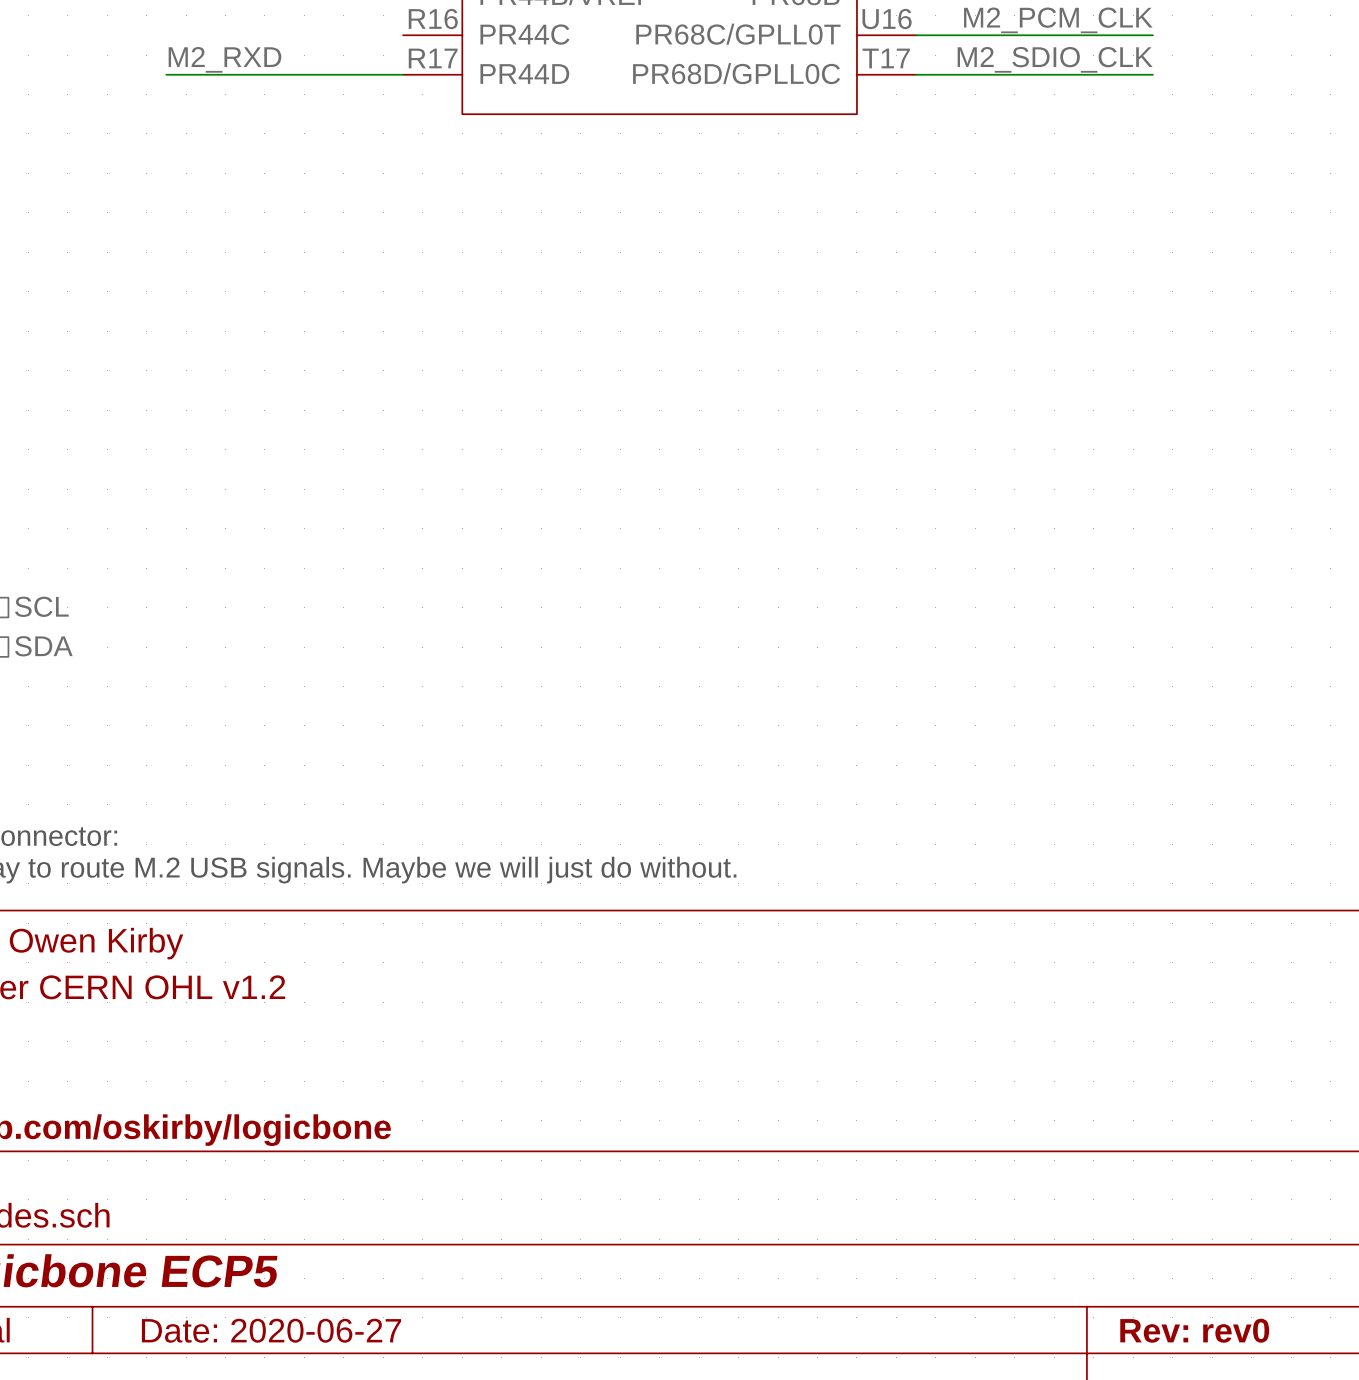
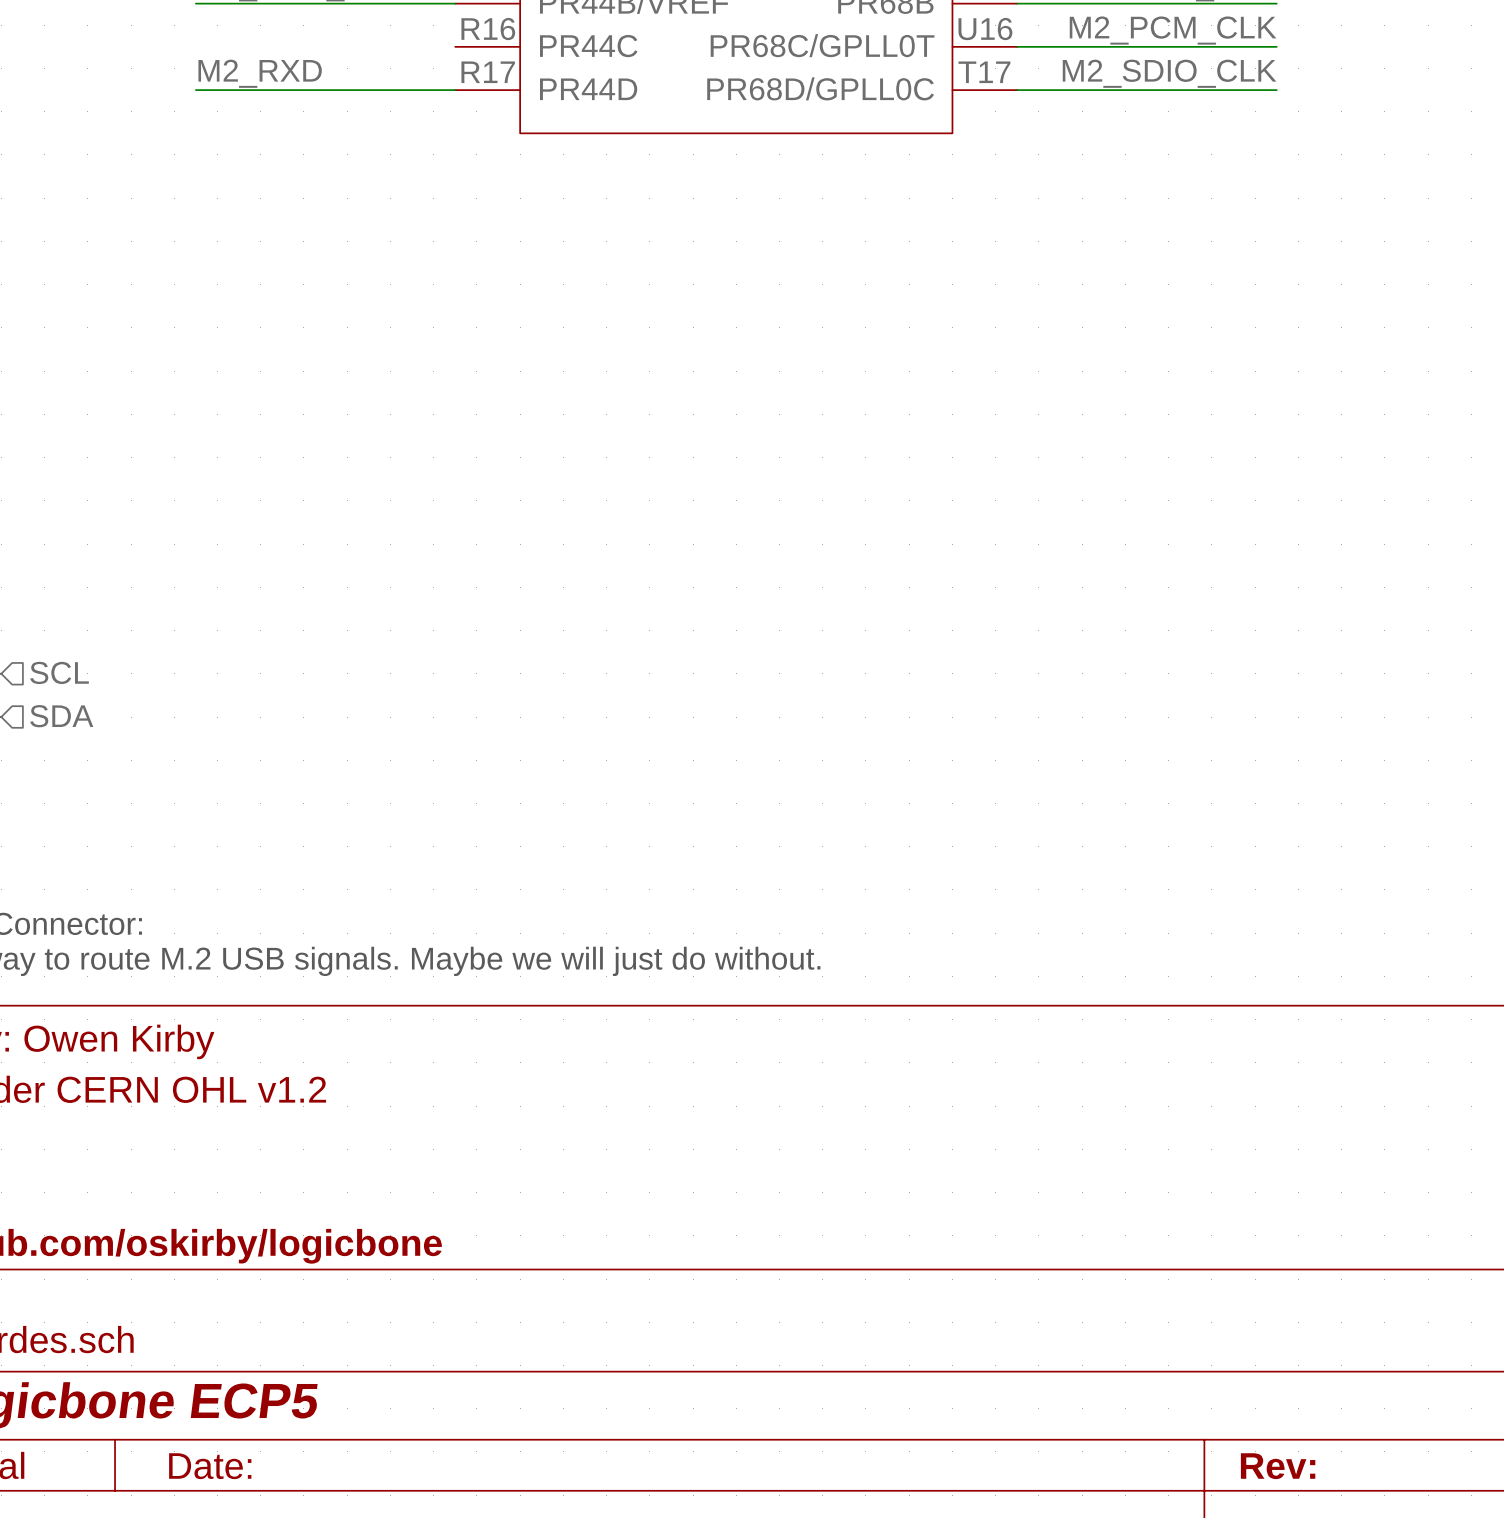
title block: Date: 2020-06-27 (271, 1330) -> Date: (210, 1466)
title block: Rev: rev0 (1194, 1330) -> Rev: (1278, 1466)

